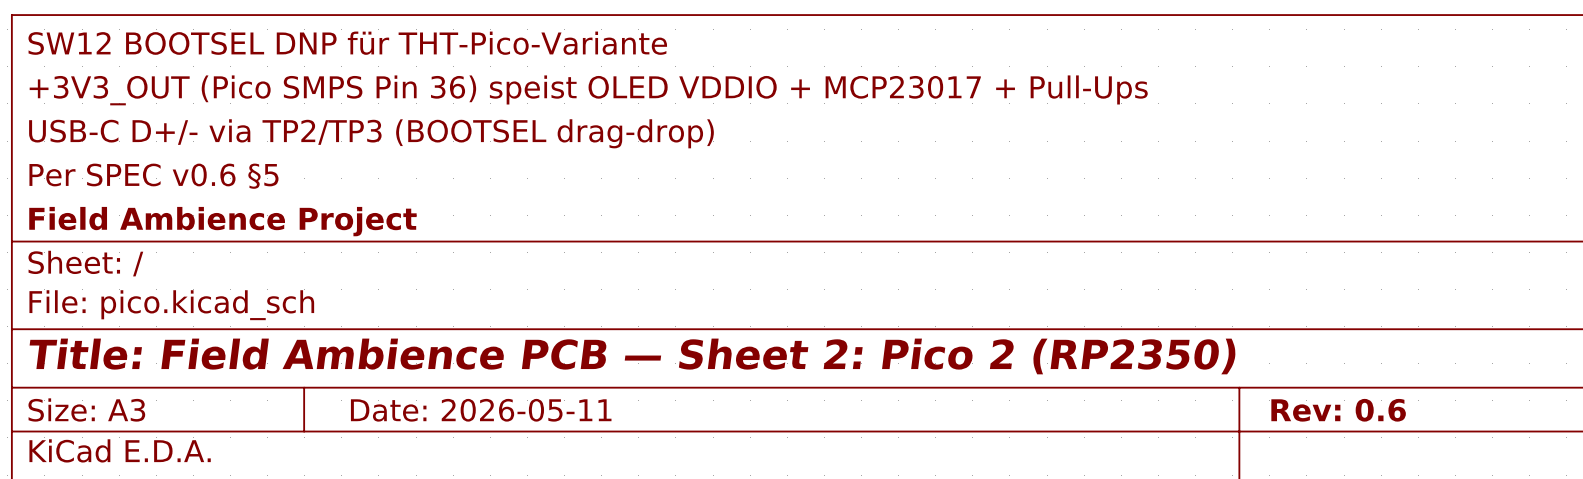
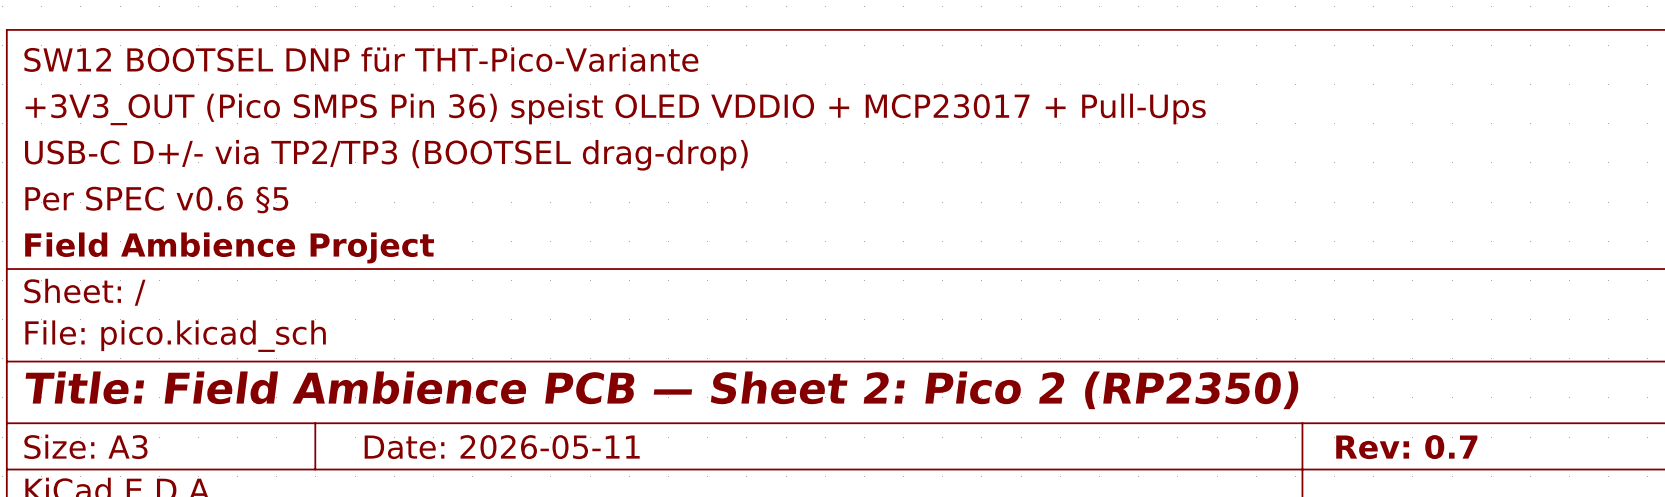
title block: Rev: 0.6 (1338, 410) -> Rev: 0.7 (1406, 447)

